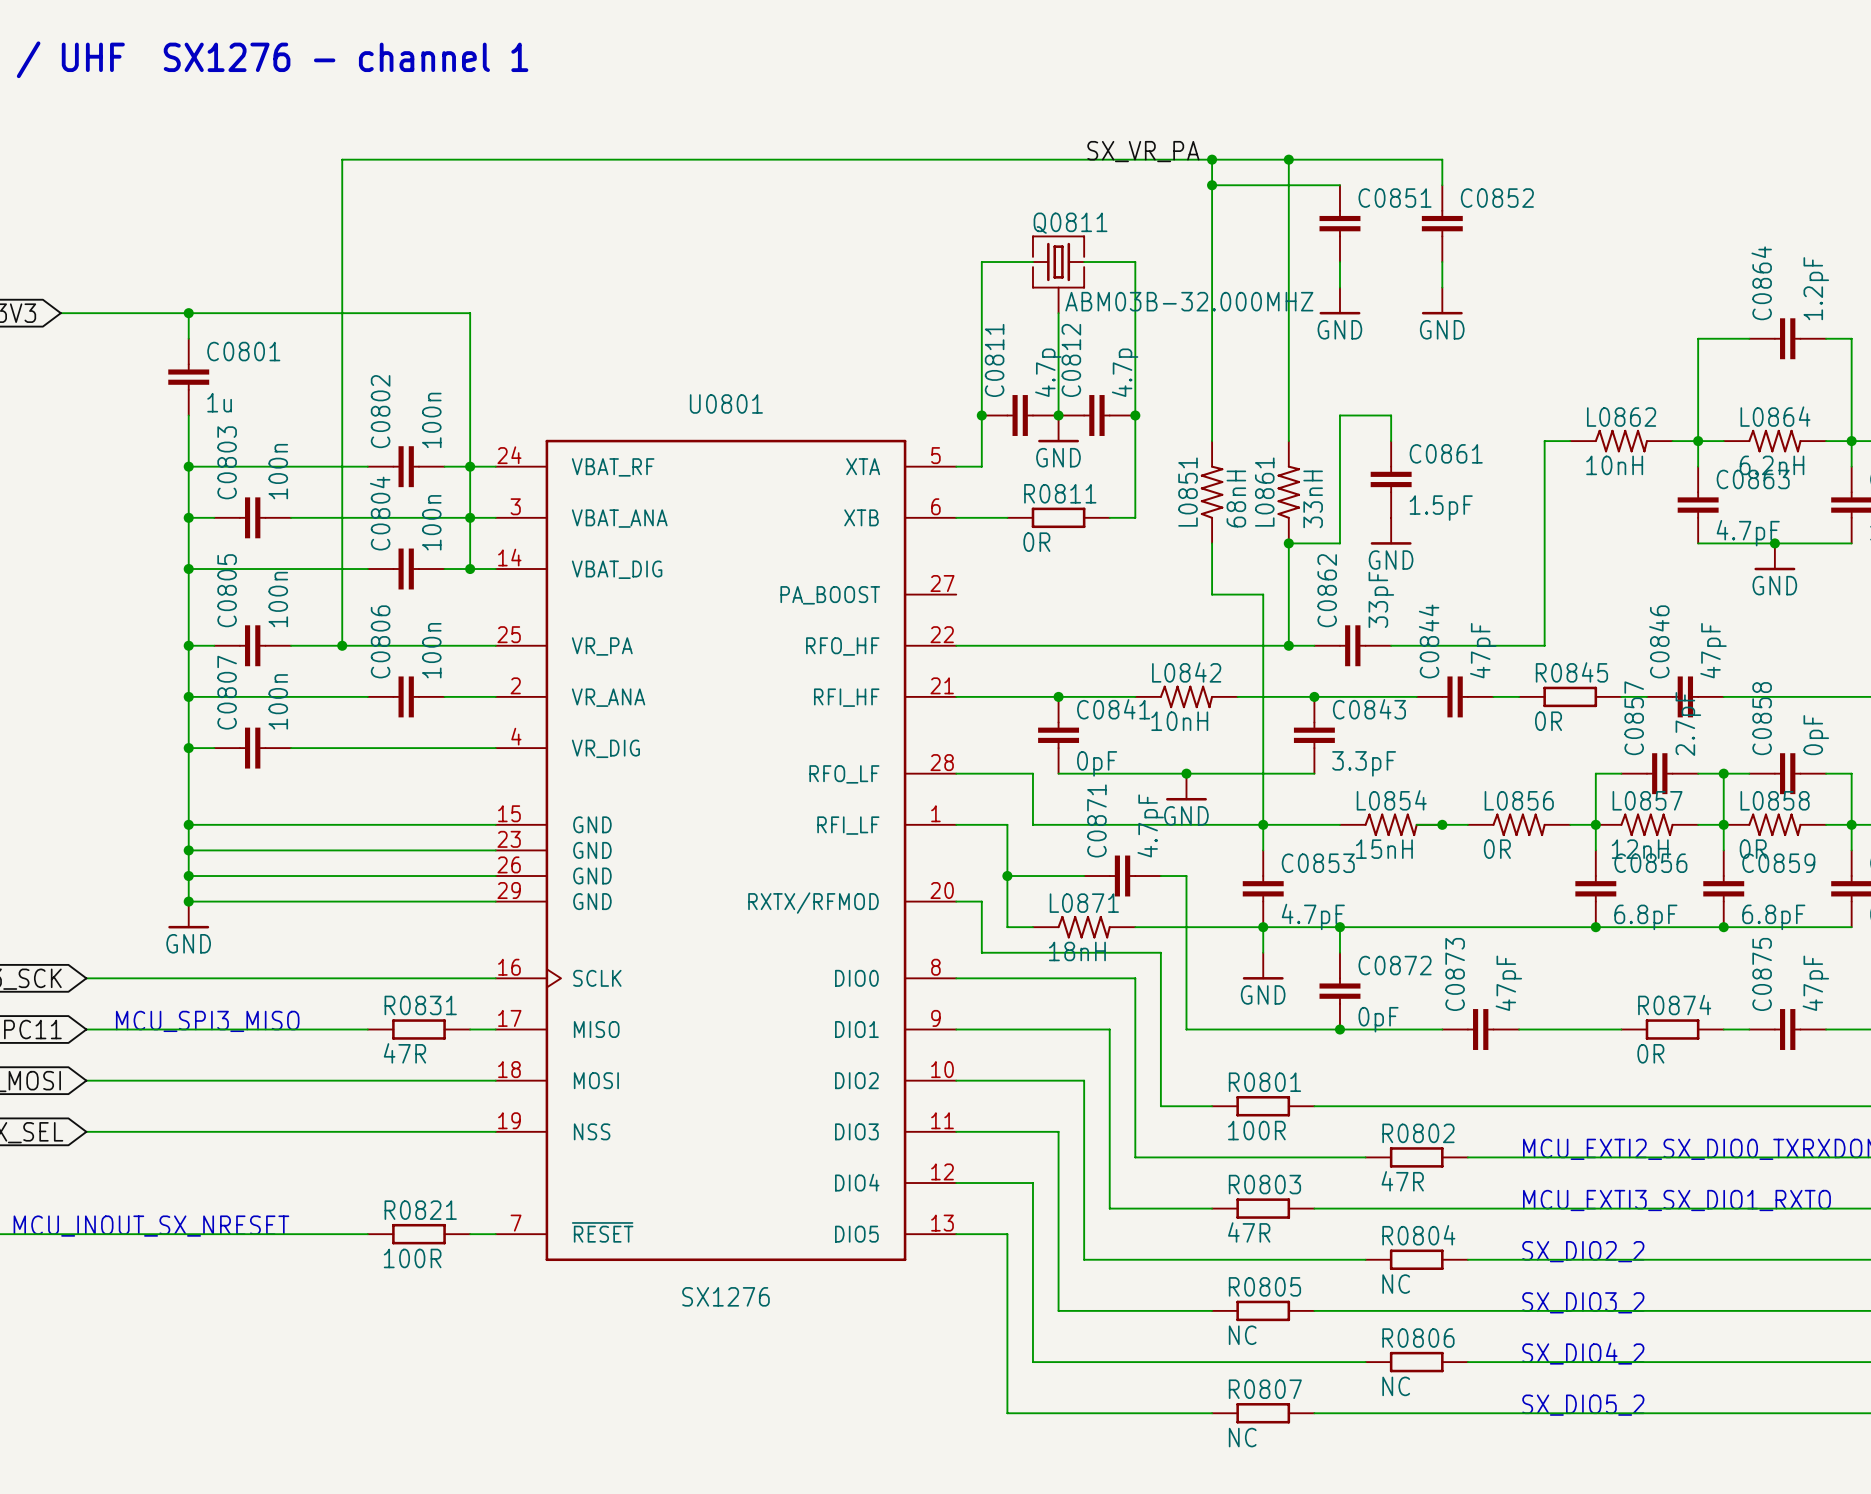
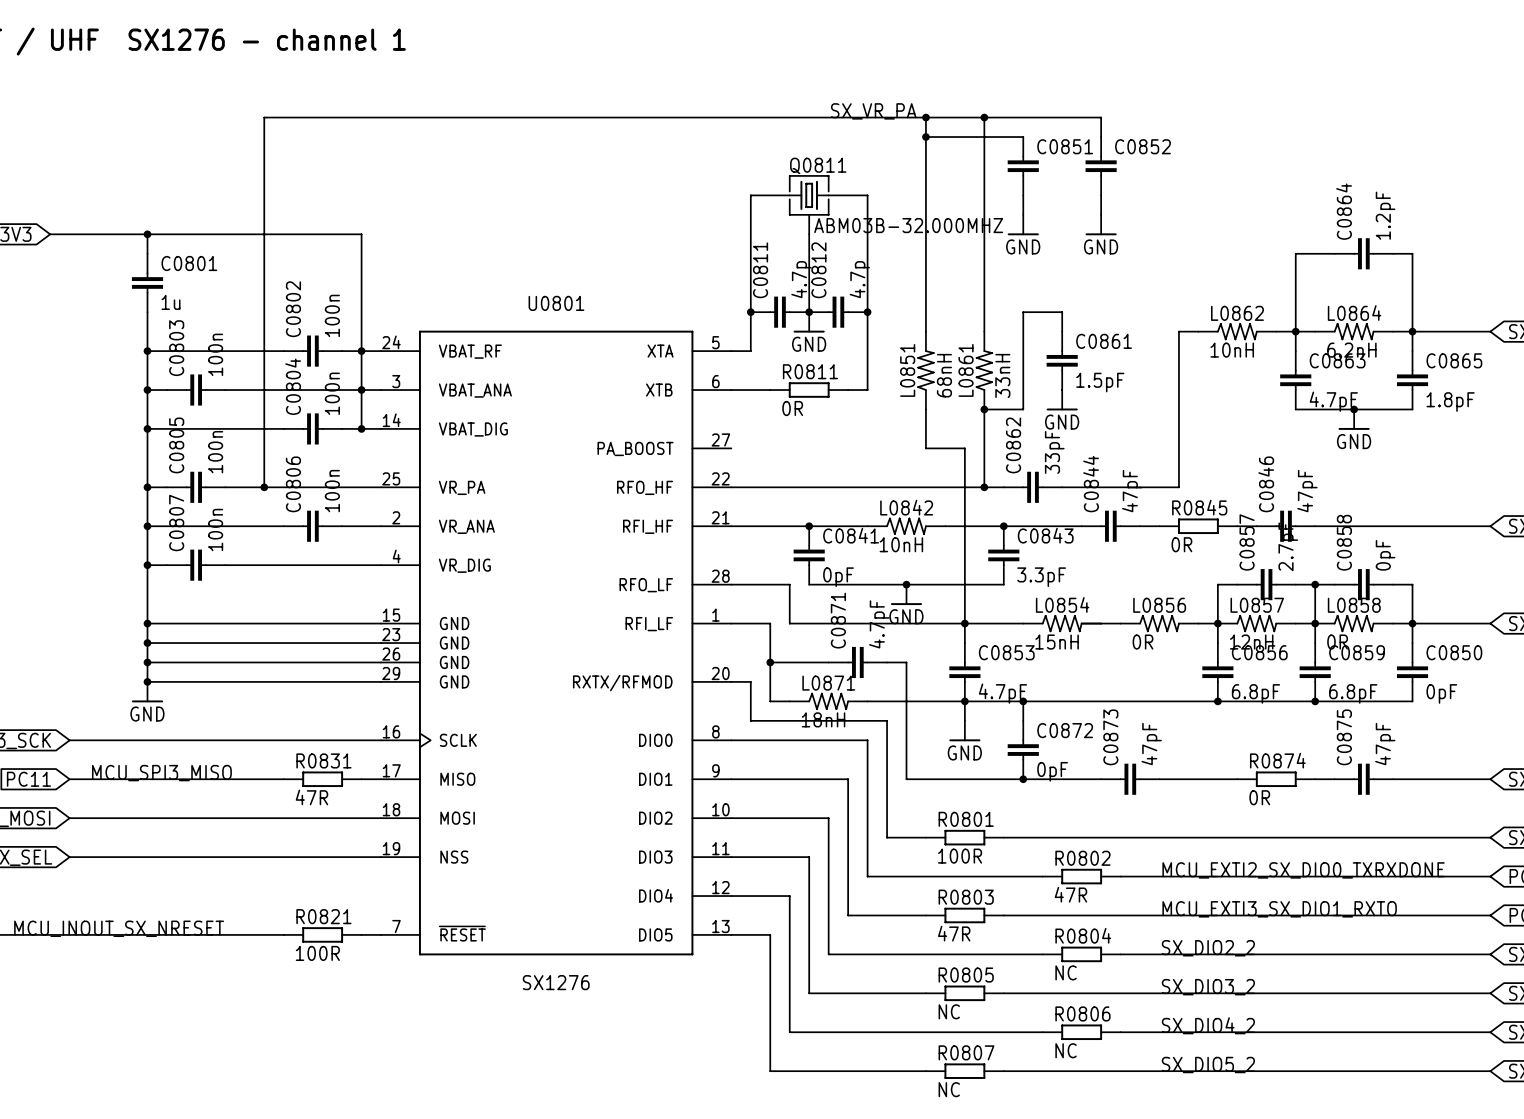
junction: (1442, 824) -> none

